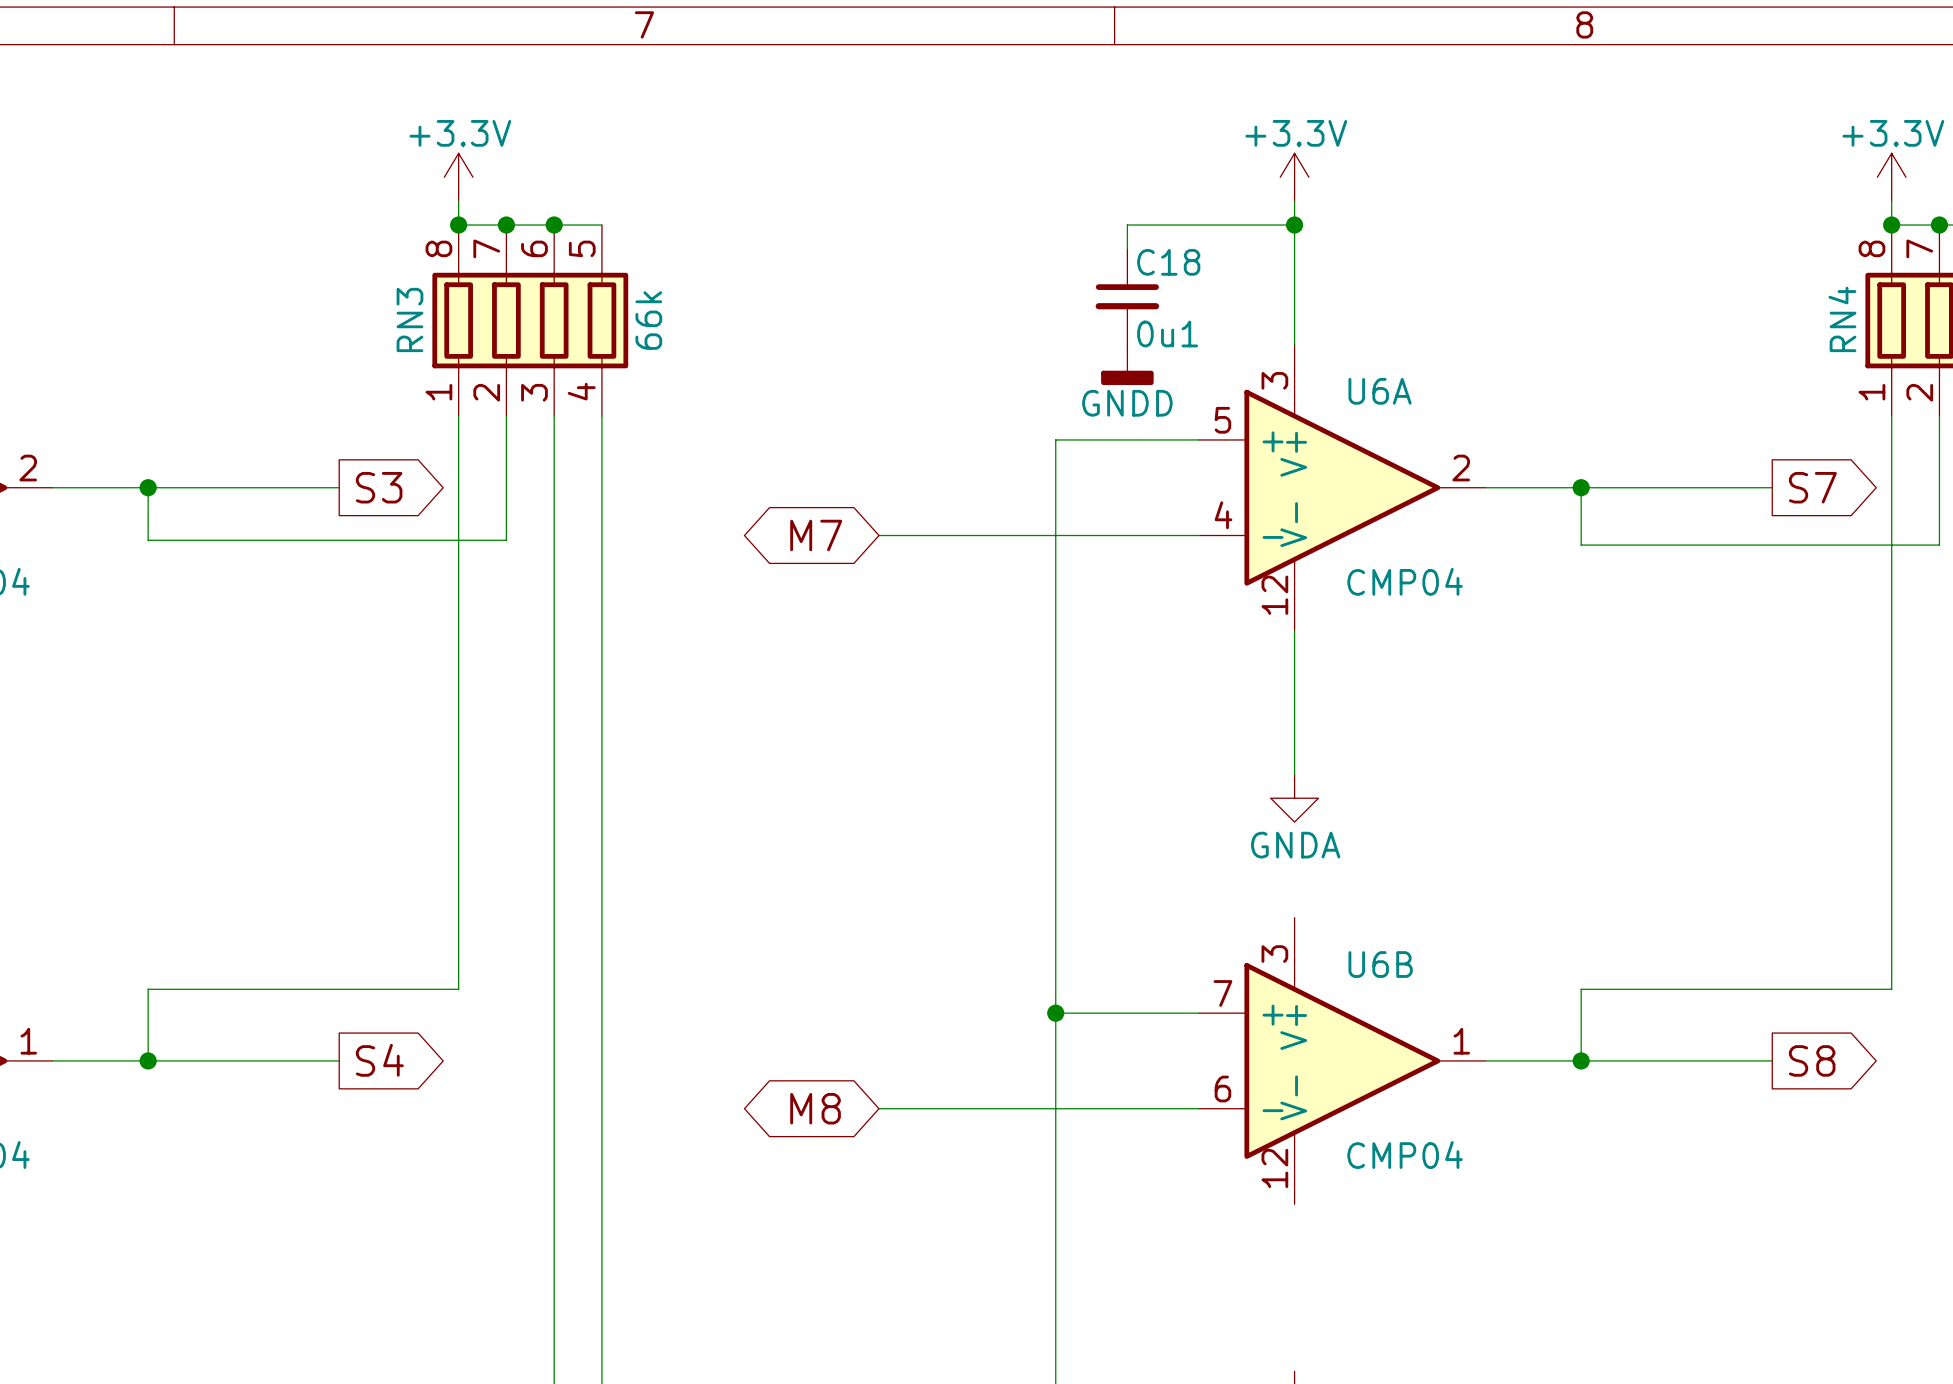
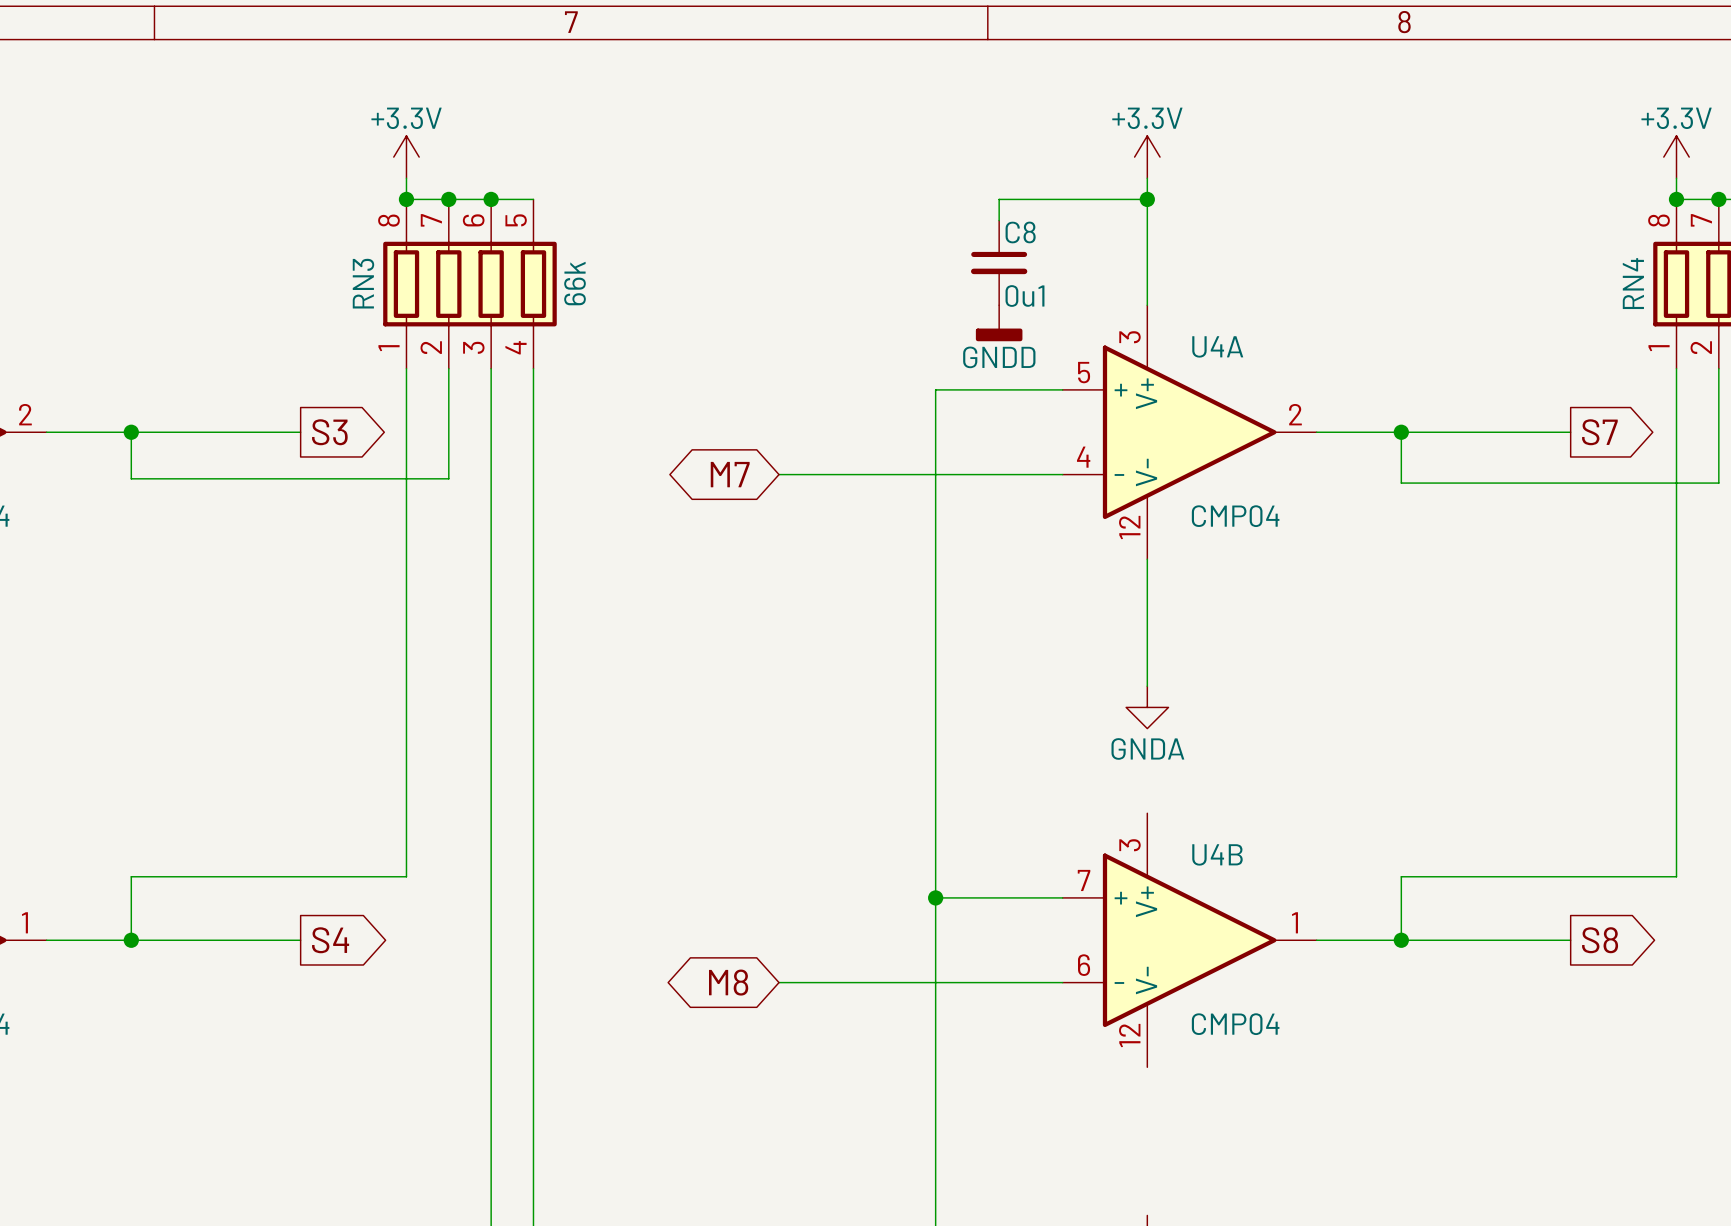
C18 name: C18 (1168, 262) -> C8 (1020, 232)
U6A name: U6A (1380, 391) -> U4A (1217, 346)
U6B name: U6B (1380, 964) -> U4B (1217, 854)

